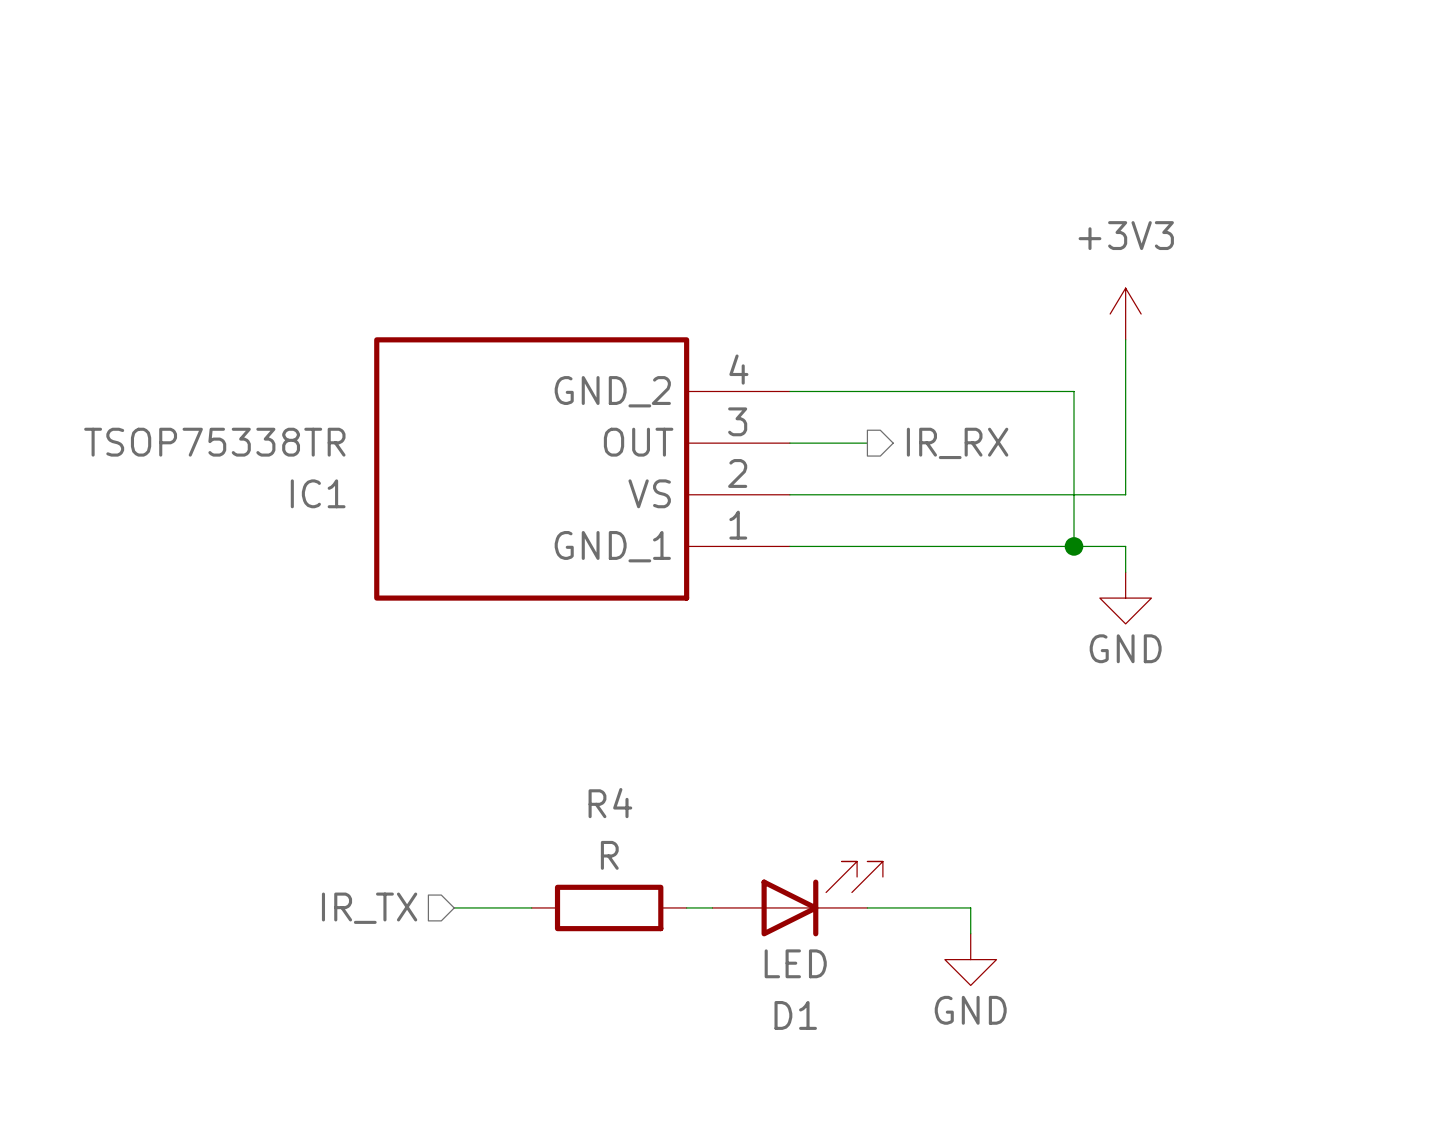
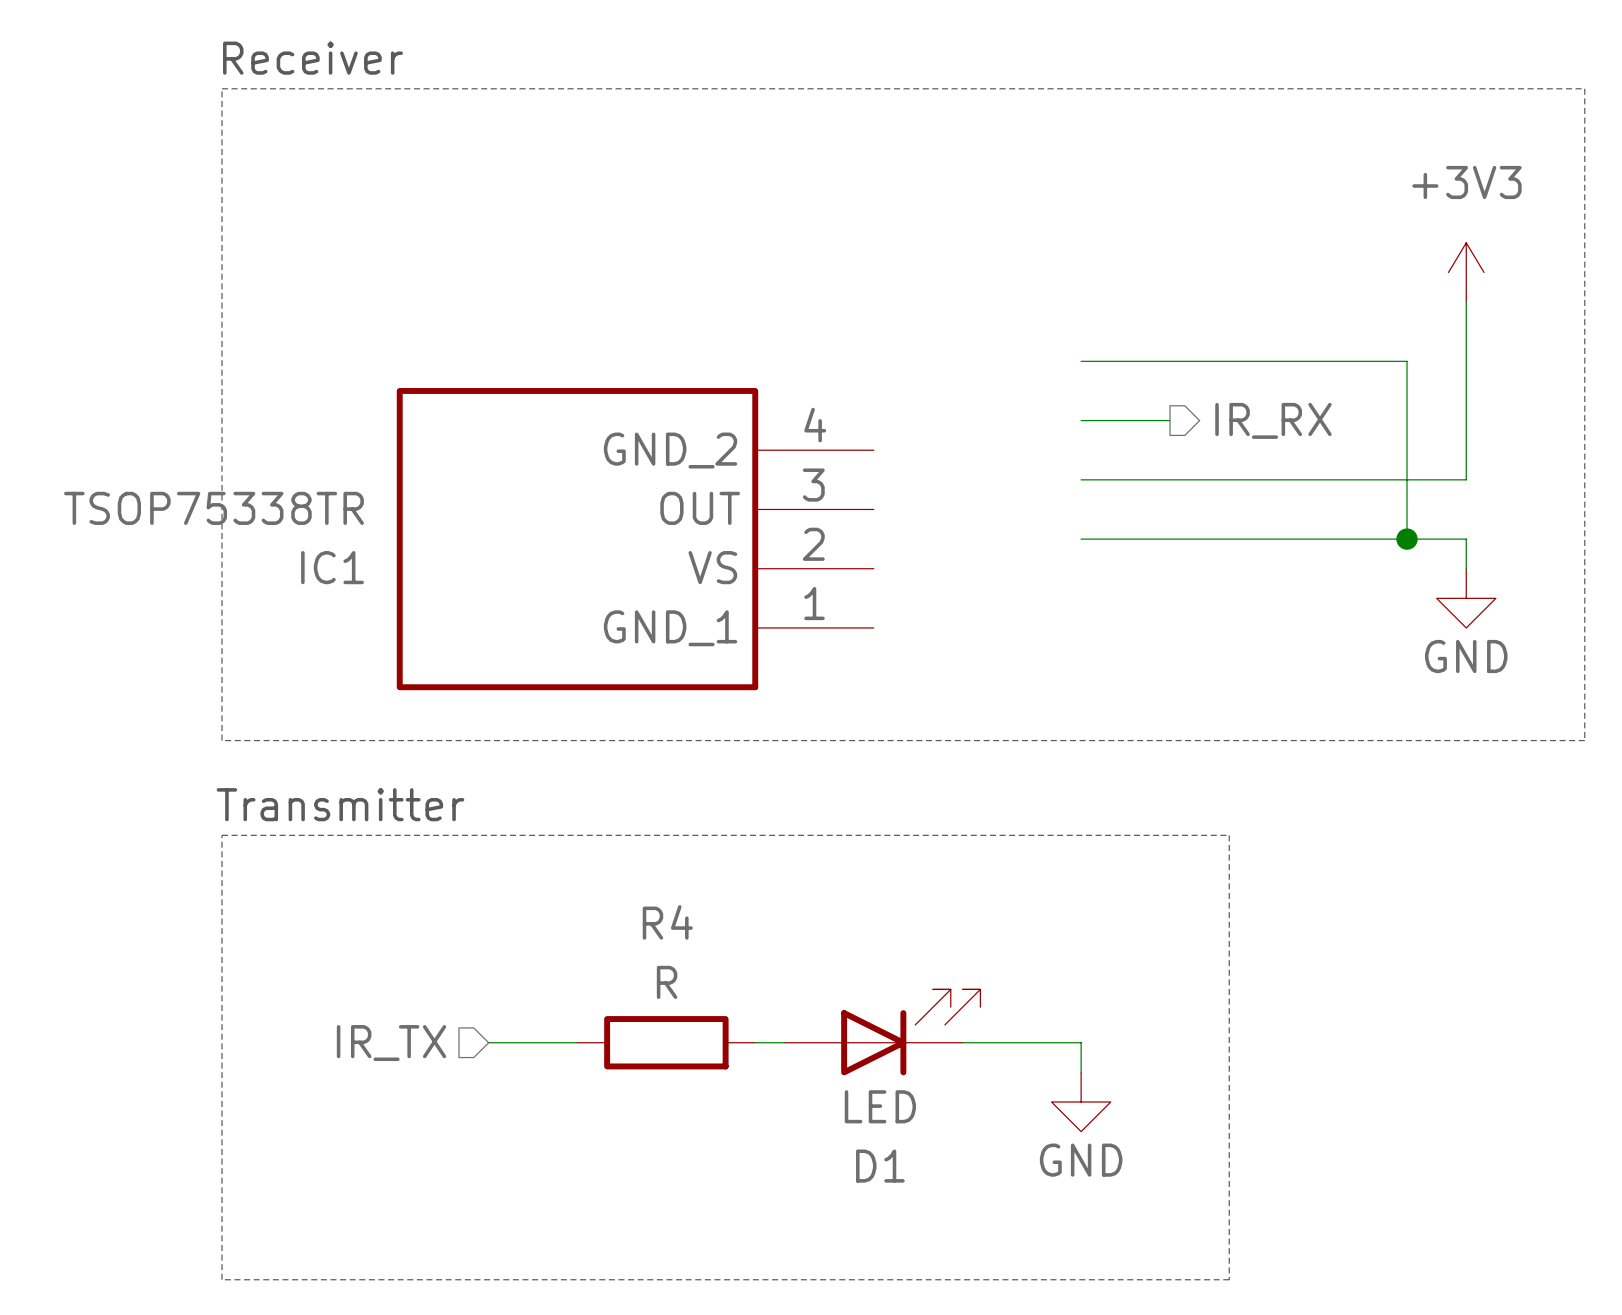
text: none -> Receiver (312, 58)
line: none -> (221, 88) (221, 740) (1584, 740) (1584, 88) (221, 88)
power symbol position: +3V3 (1125, 314) -> +3V3 (1466, 272)
wire: (1125, 339) (1125, 494) (789, 494) -> (1466, 302) (1466, 479) (1081, 479)
wire: (789, 391) (1074, 391) (1074, 546) -> (1081, 361) (1407, 361) (1407, 539)
wire: (789, 443) (867, 443) -> (1081, 420) (1170, 420)
hierarchical label position: IR_RX (957, 443) -> IR_RX (1273, 420)
junction: none -> (1407, 539)
wire: (789, 546) (1125, 546) (1125, 572) -> (1081, 539) (1466, 539) (1466, 568)
junction: (1074, 546) -> none
power symbol position: GND (1125, 598) -> GND (1466, 598)
text: none -> Transmitter (340, 804)
line: none -> (221, 835) (1229, 835) (1229, 1279) (221, 1279) (221, 835)

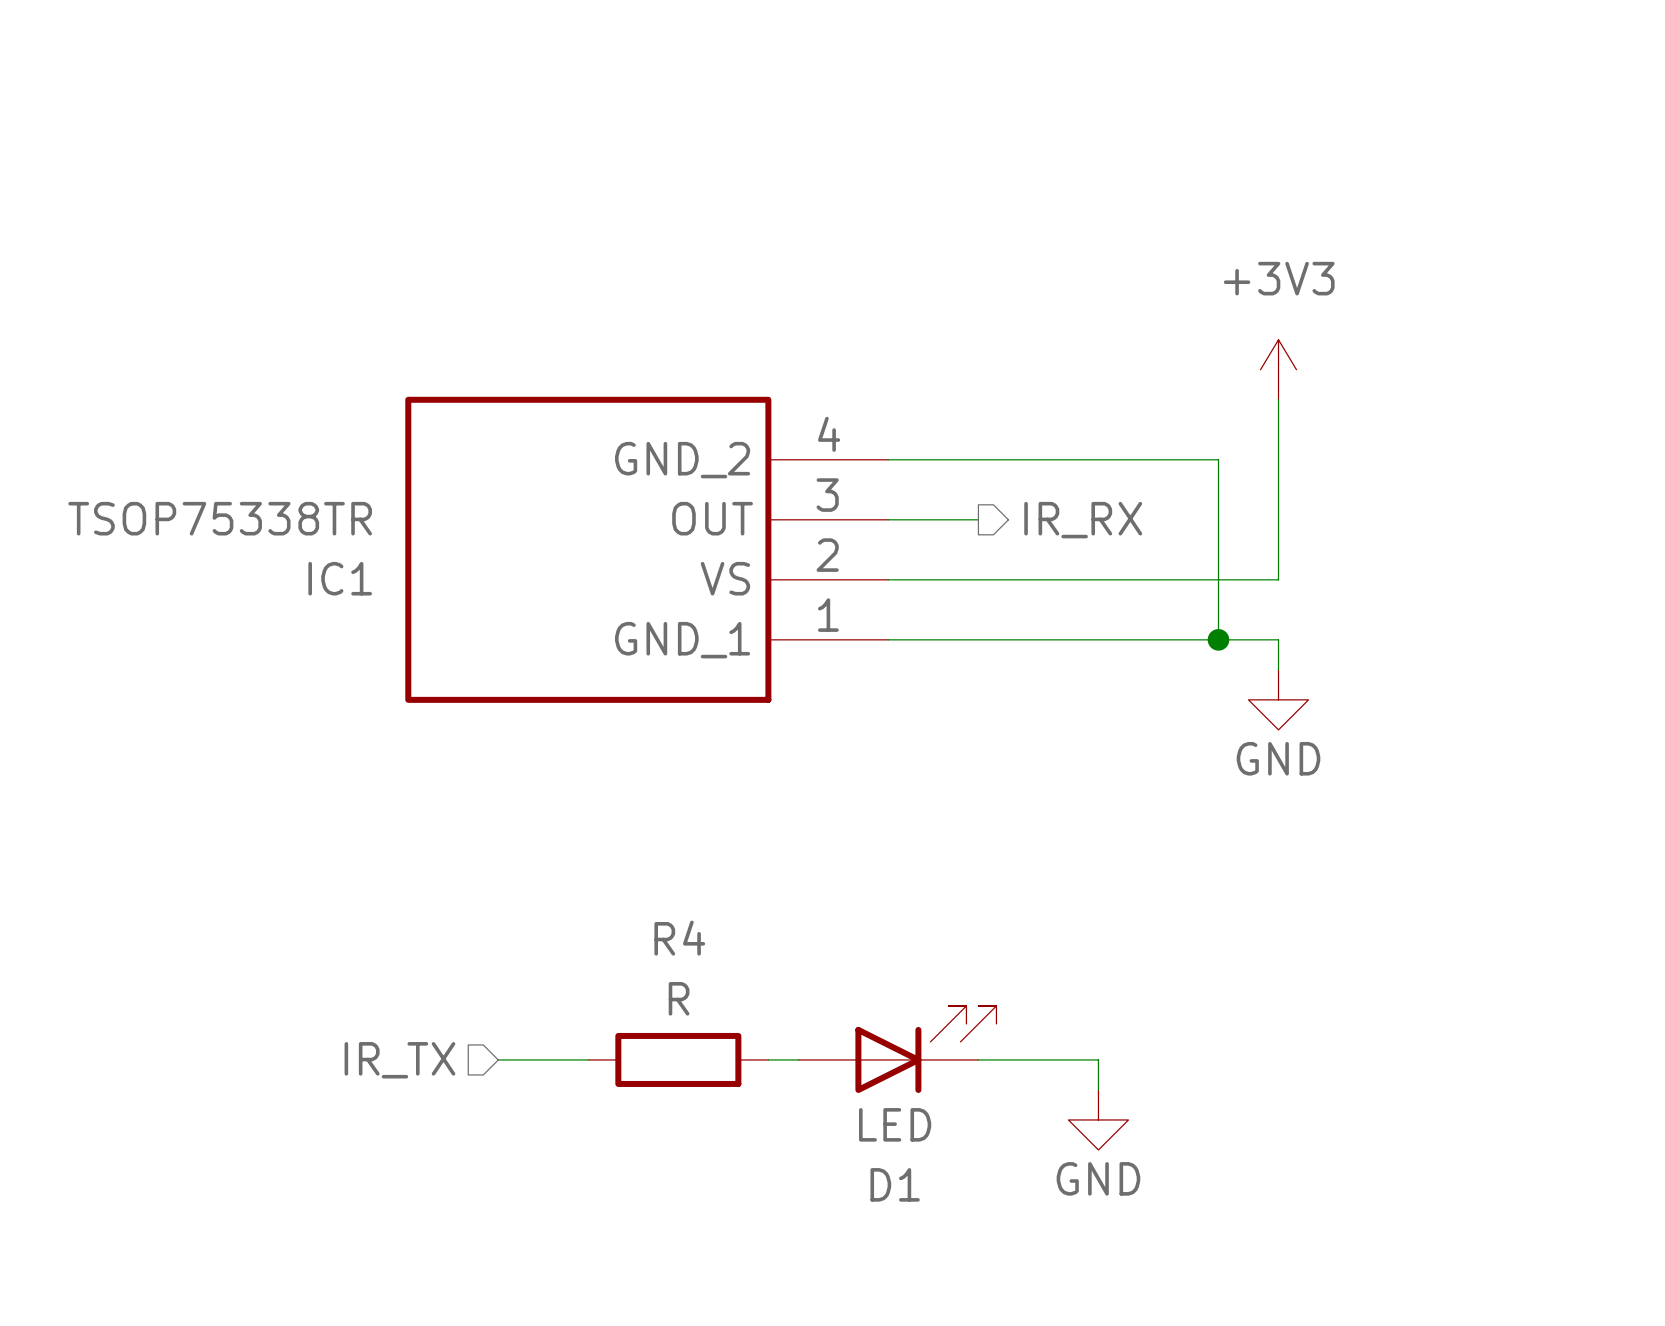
text: Receiver (312, 58) -> none
line: (221, 88) (221, 740) (1584, 740) (1584, 88) (221, 88) -> none
power symbol position: +3V3 (1466, 272) -> +3V3 (1278, 369)
wire: (1466, 302) (1466, 479) (1081, 479) -> (1278, 399) (1278, 579) (888, 579)
wire: (1081, 361) (1407, 361) (1407, 539) -> (888, 459) (1218, 459) (1218, 639)
wire: (1081, 420) (1170, 420) -> (888, 519) (978, 519)
hierarchical label position: IR_RX (1273, 420) -> IR_RX (1083, 520)
wire: (1081, 539) (1466, 539) (1466, 568) -> (888, 639) (1278, 639) (1278, 669)
junction: (1407, 539) -> none
power symbol position: GND (1466, 598) -> GND (1278, 699)
junction: none -> (1218, 639)
text: Transmitter (340, 804) -> none
line: (221, 835) (1229, 835) (1229, 1279) (221, 1279) (221, 835) -> none

